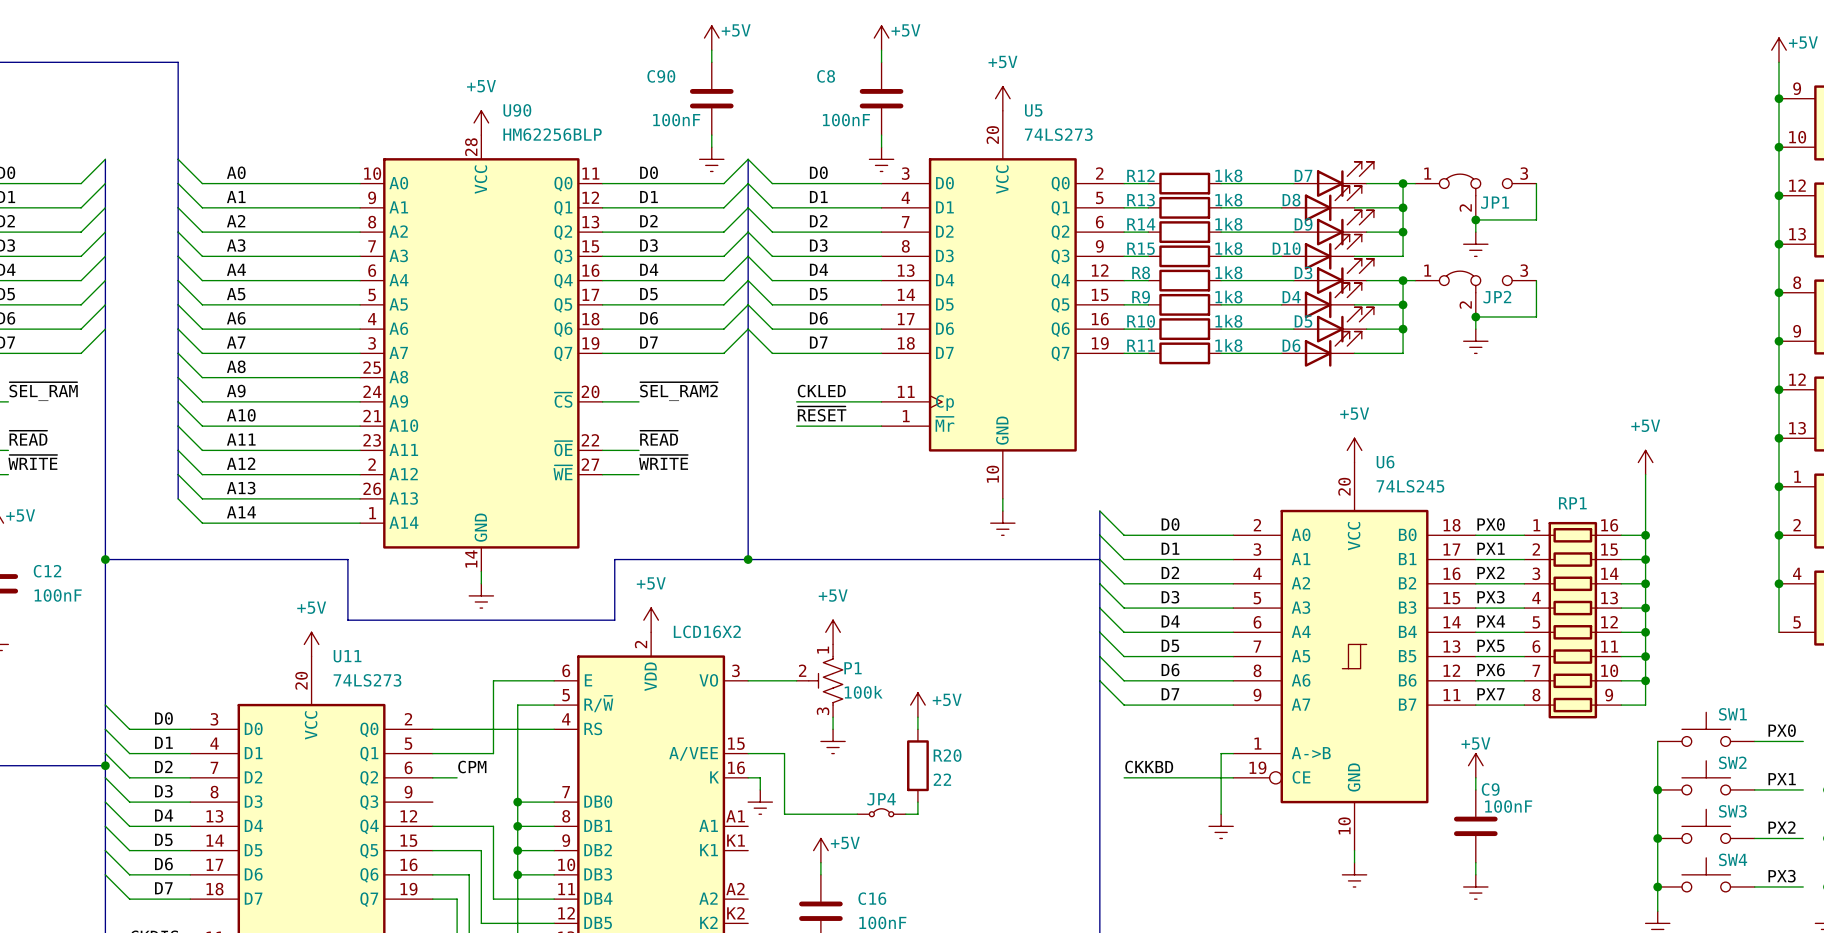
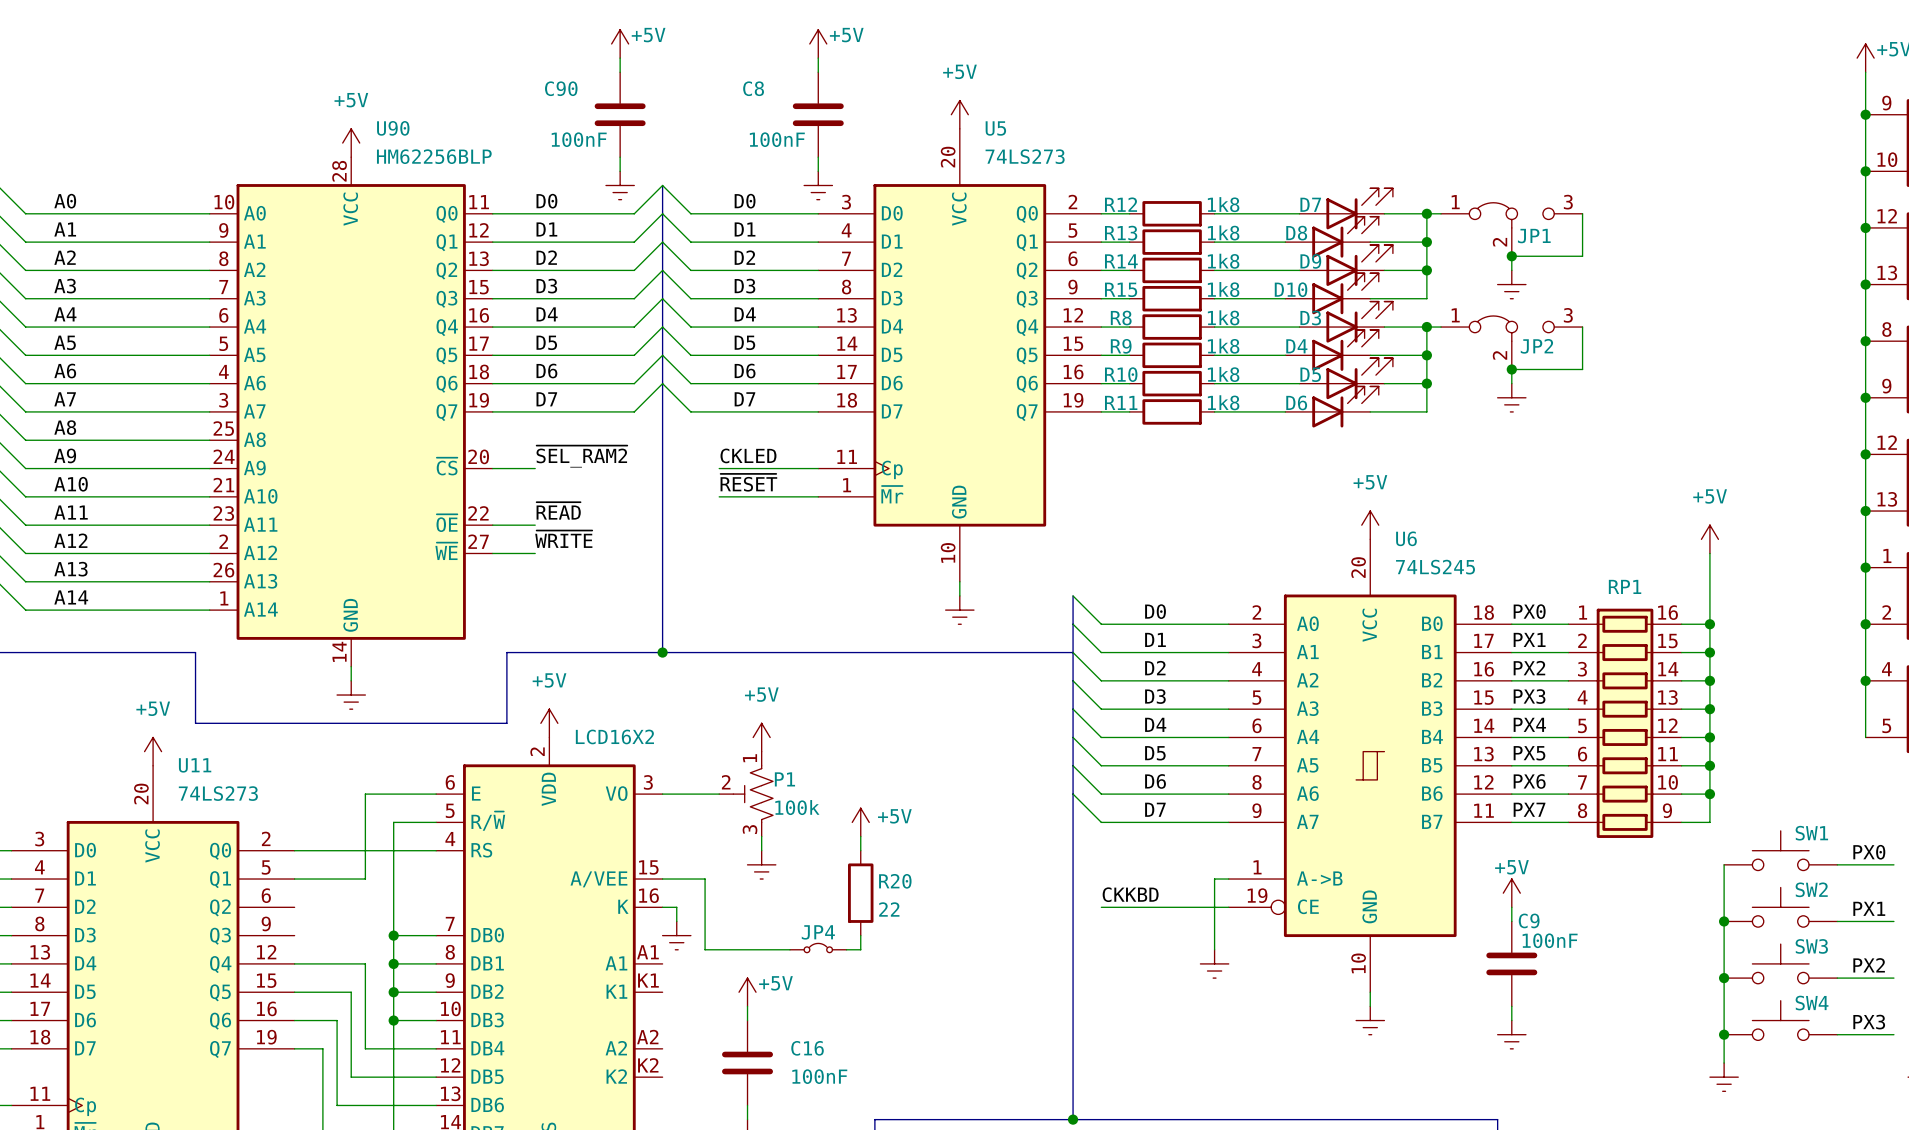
label: CPM (472, 767) -> none
wire: (432, 777) (457, 777) -> none

